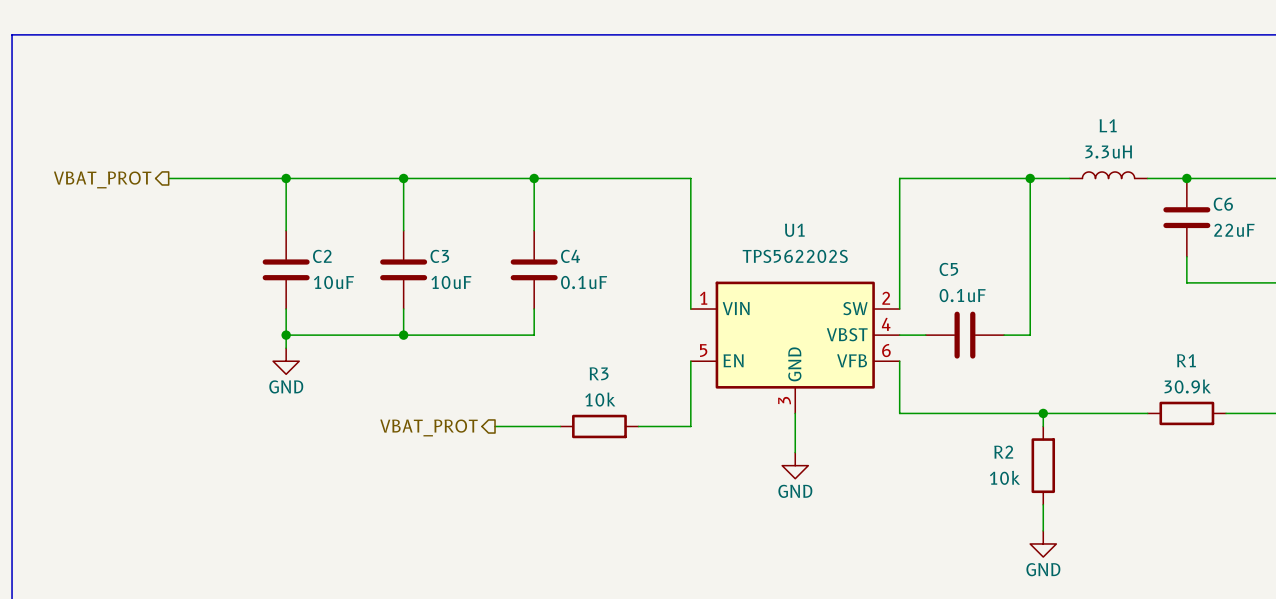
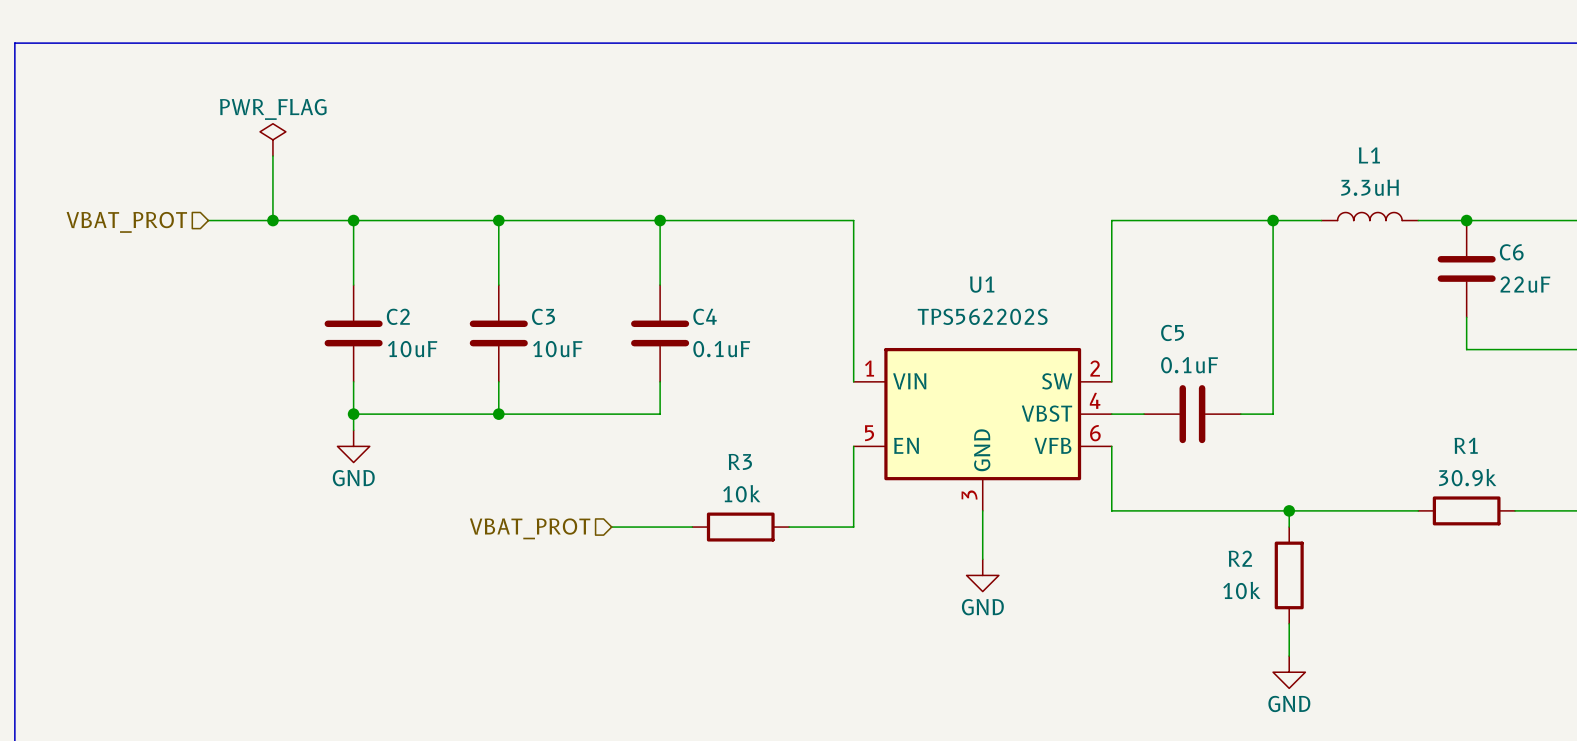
power symbol: none -> PWR_FLAG (272, 139)
wire: none -> (272, 156) (272, 220)
junction: none -> (272, 220)
hierarchical label shape: output (102, 179) -> input (126, 222)
hierarchical label shape: output (428, 427) -> input (530, 528)

